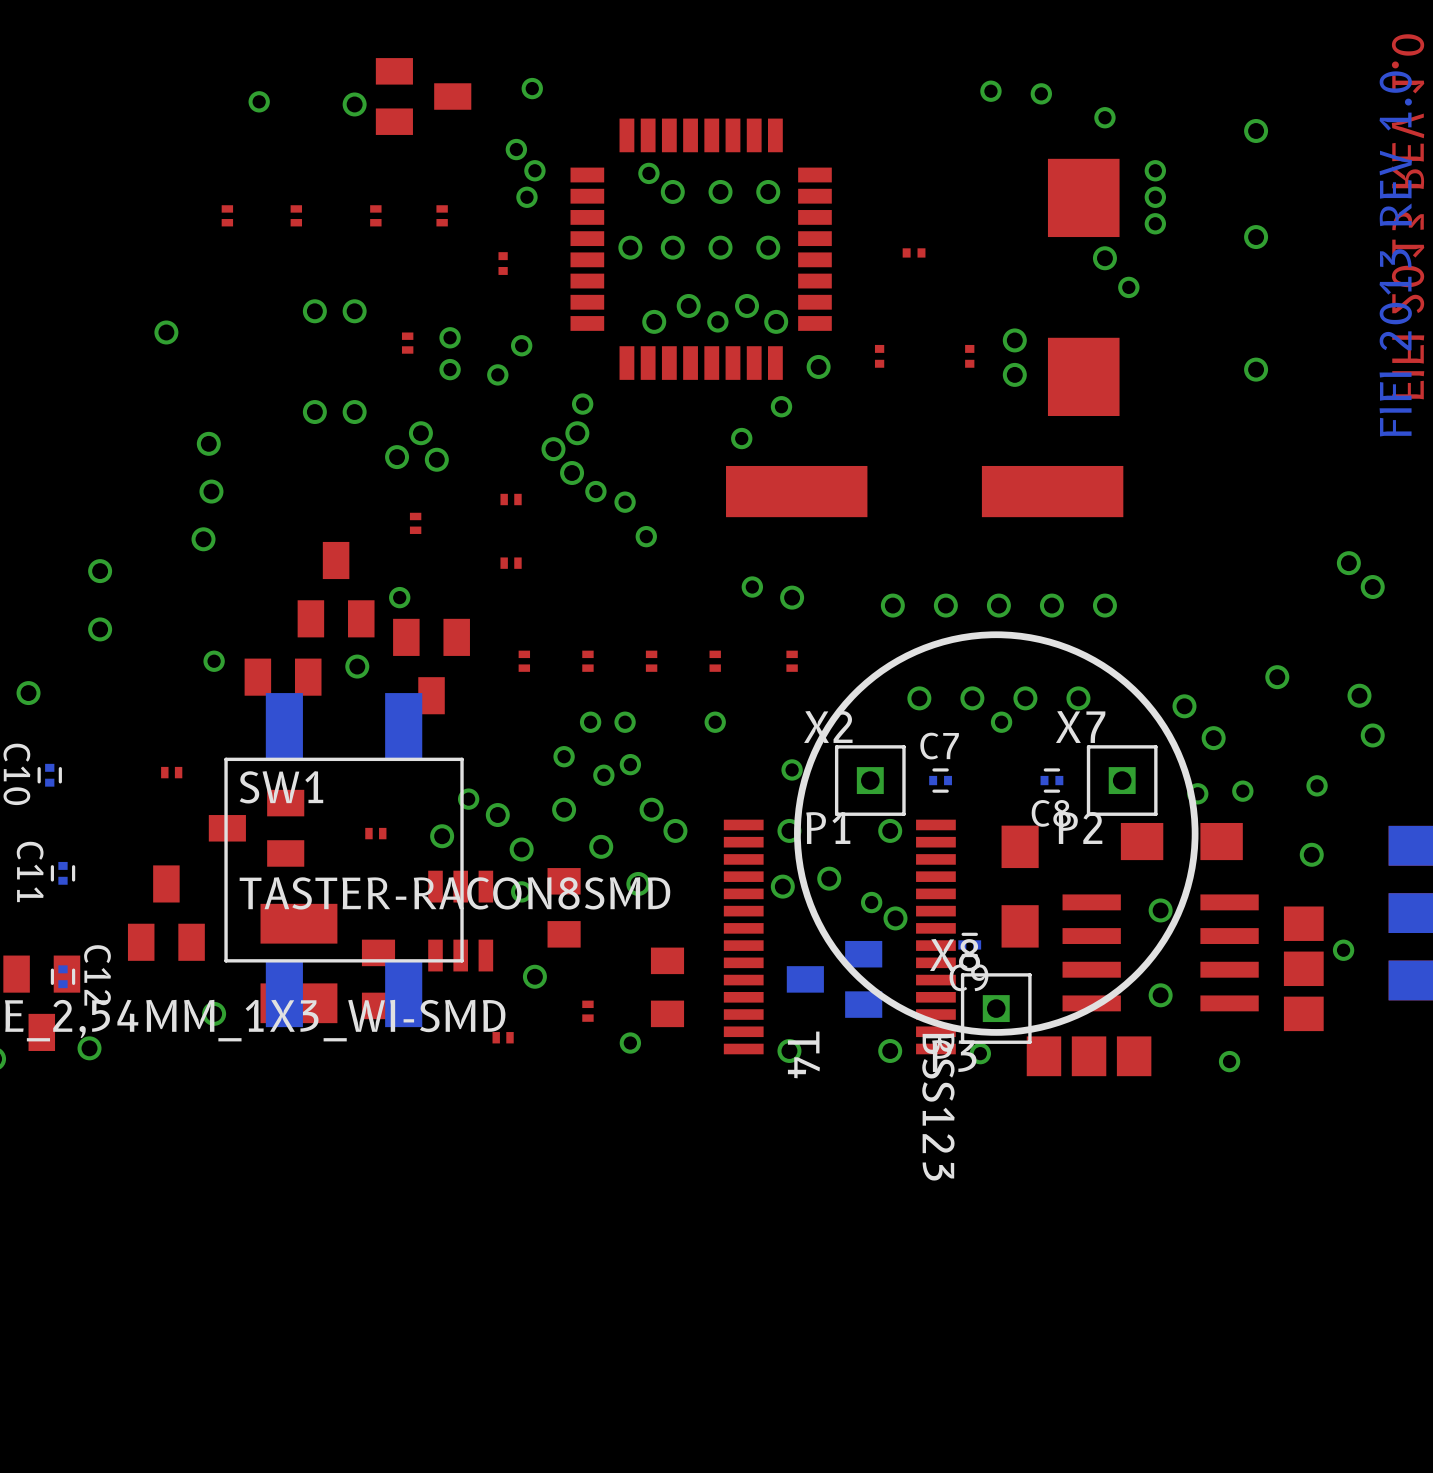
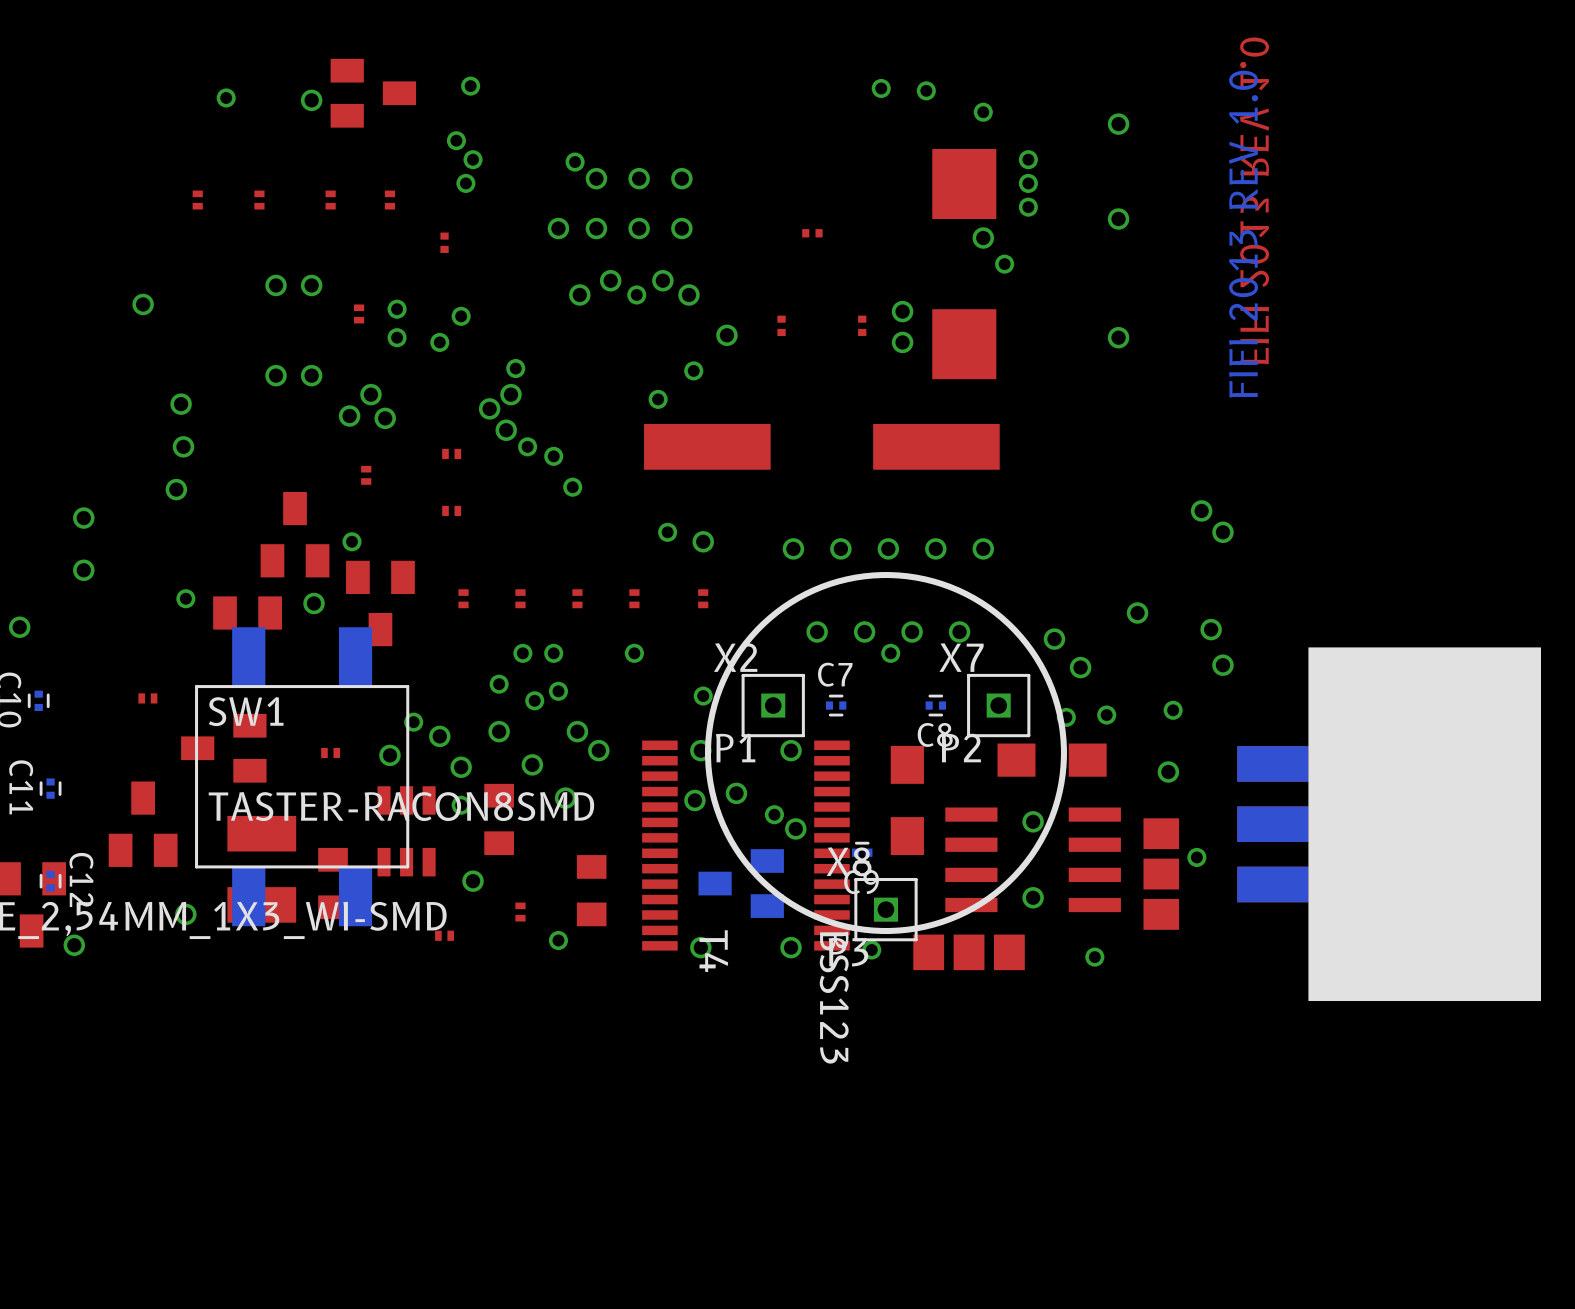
part: (701, 249) -> none

